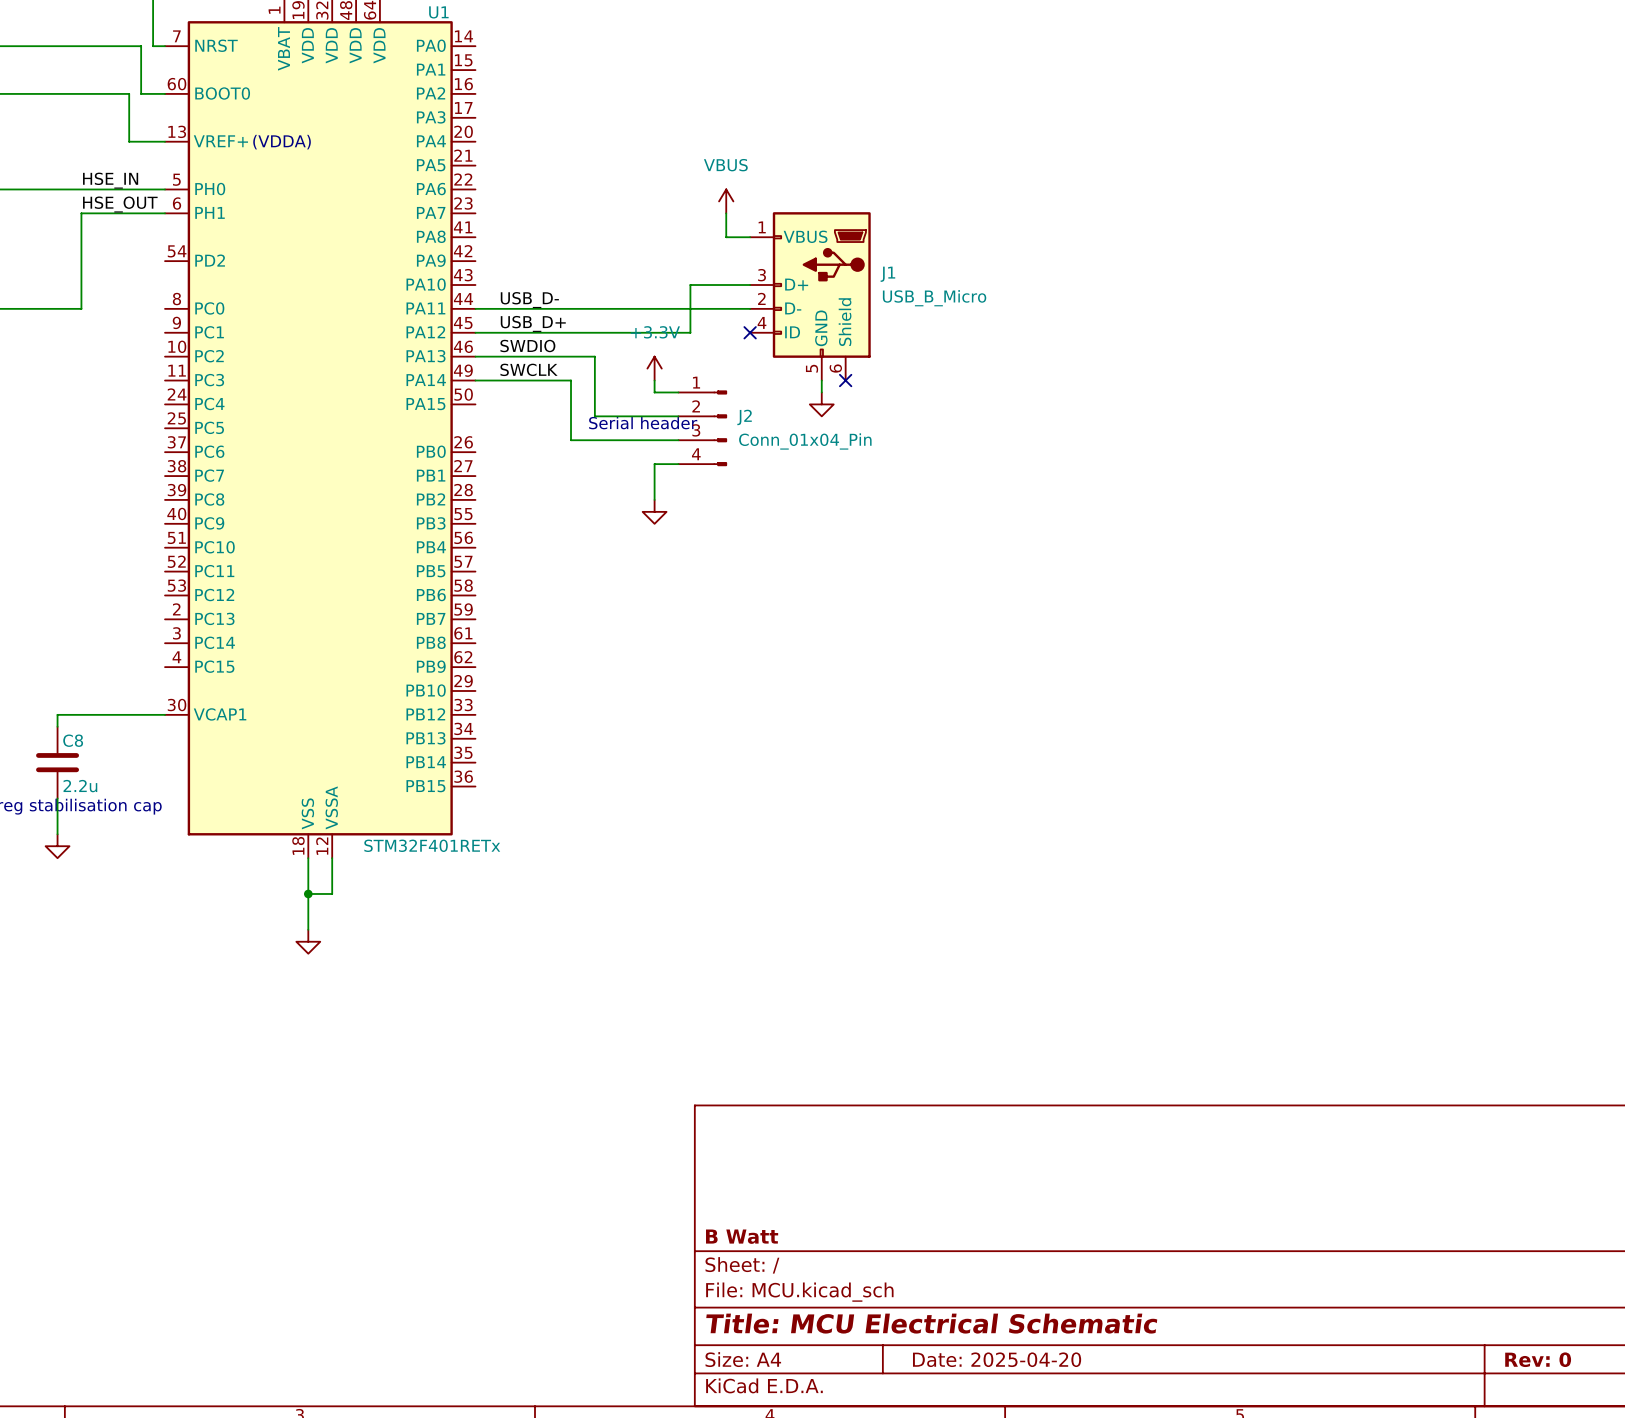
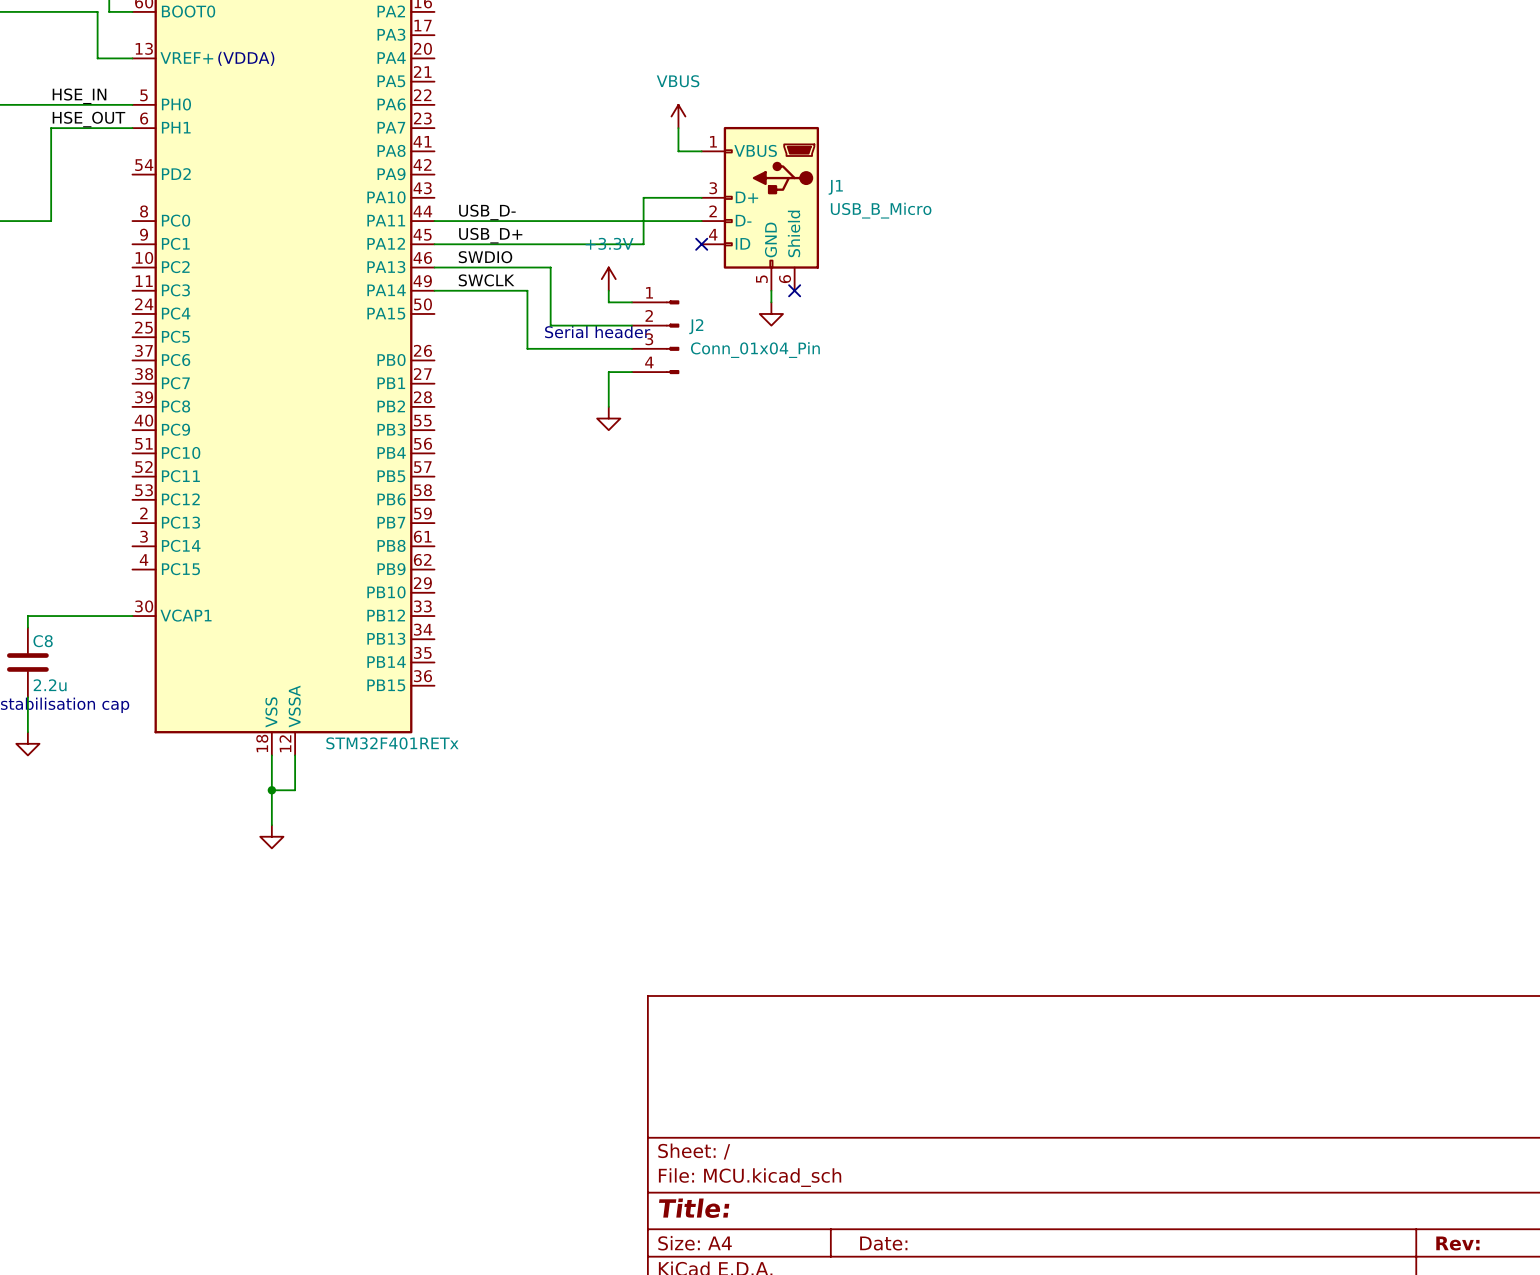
title block: B Watt (742, 1236) -> none
title block: Title: MCU Electrical Schematic (931, 1323) -> Title: (694, 1208)
title block: Date: 2025-04-20 (997, 1359) -> Date: (883, 1243)
title block: Rev: 0 (1538, 1359) -> Rev: (1457, 1243)

